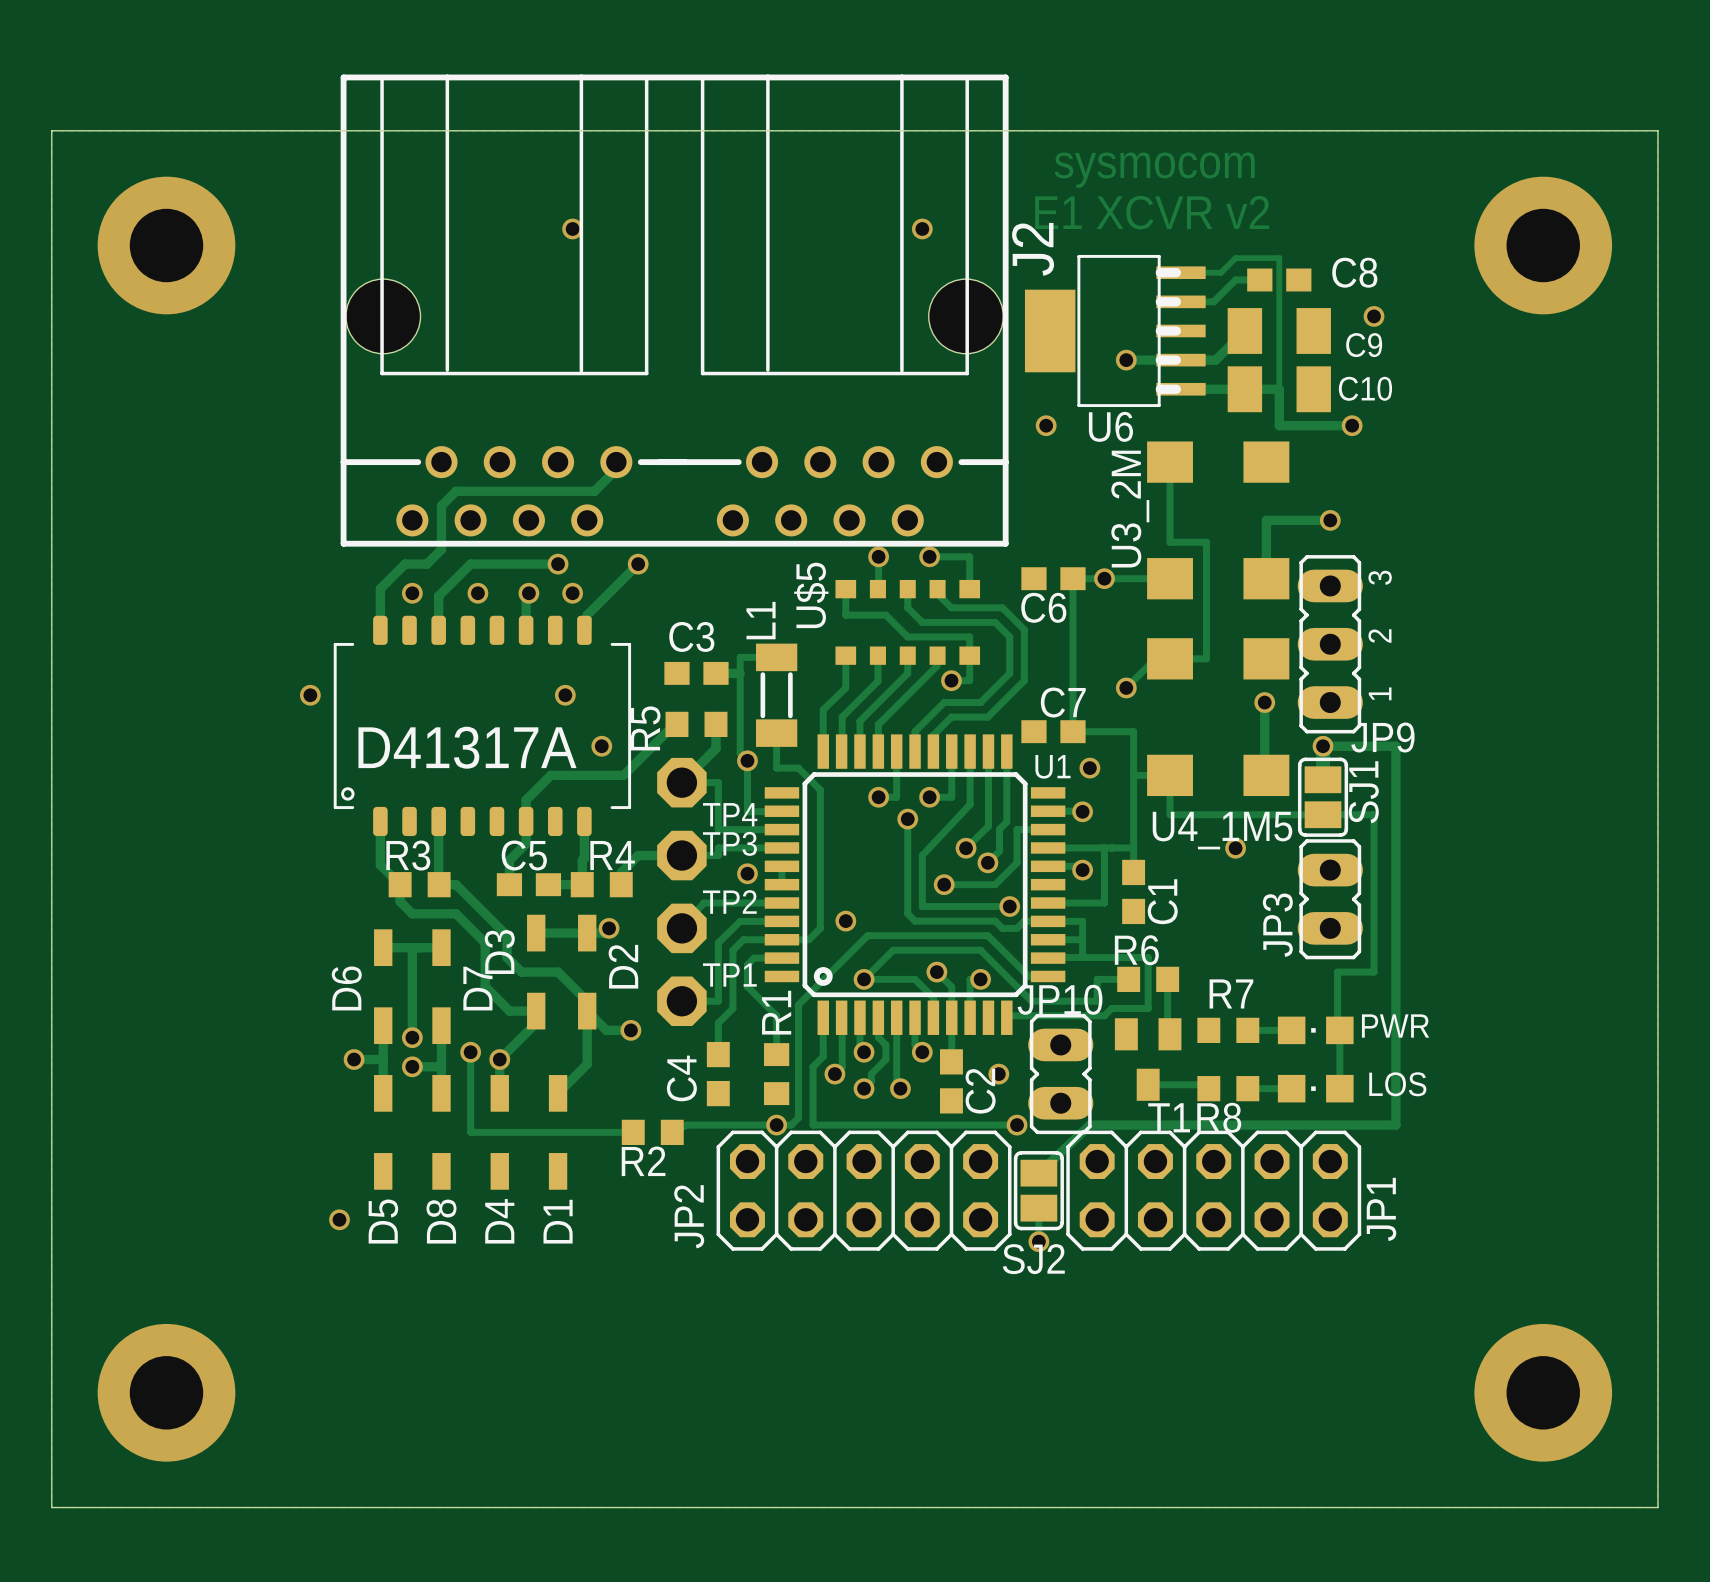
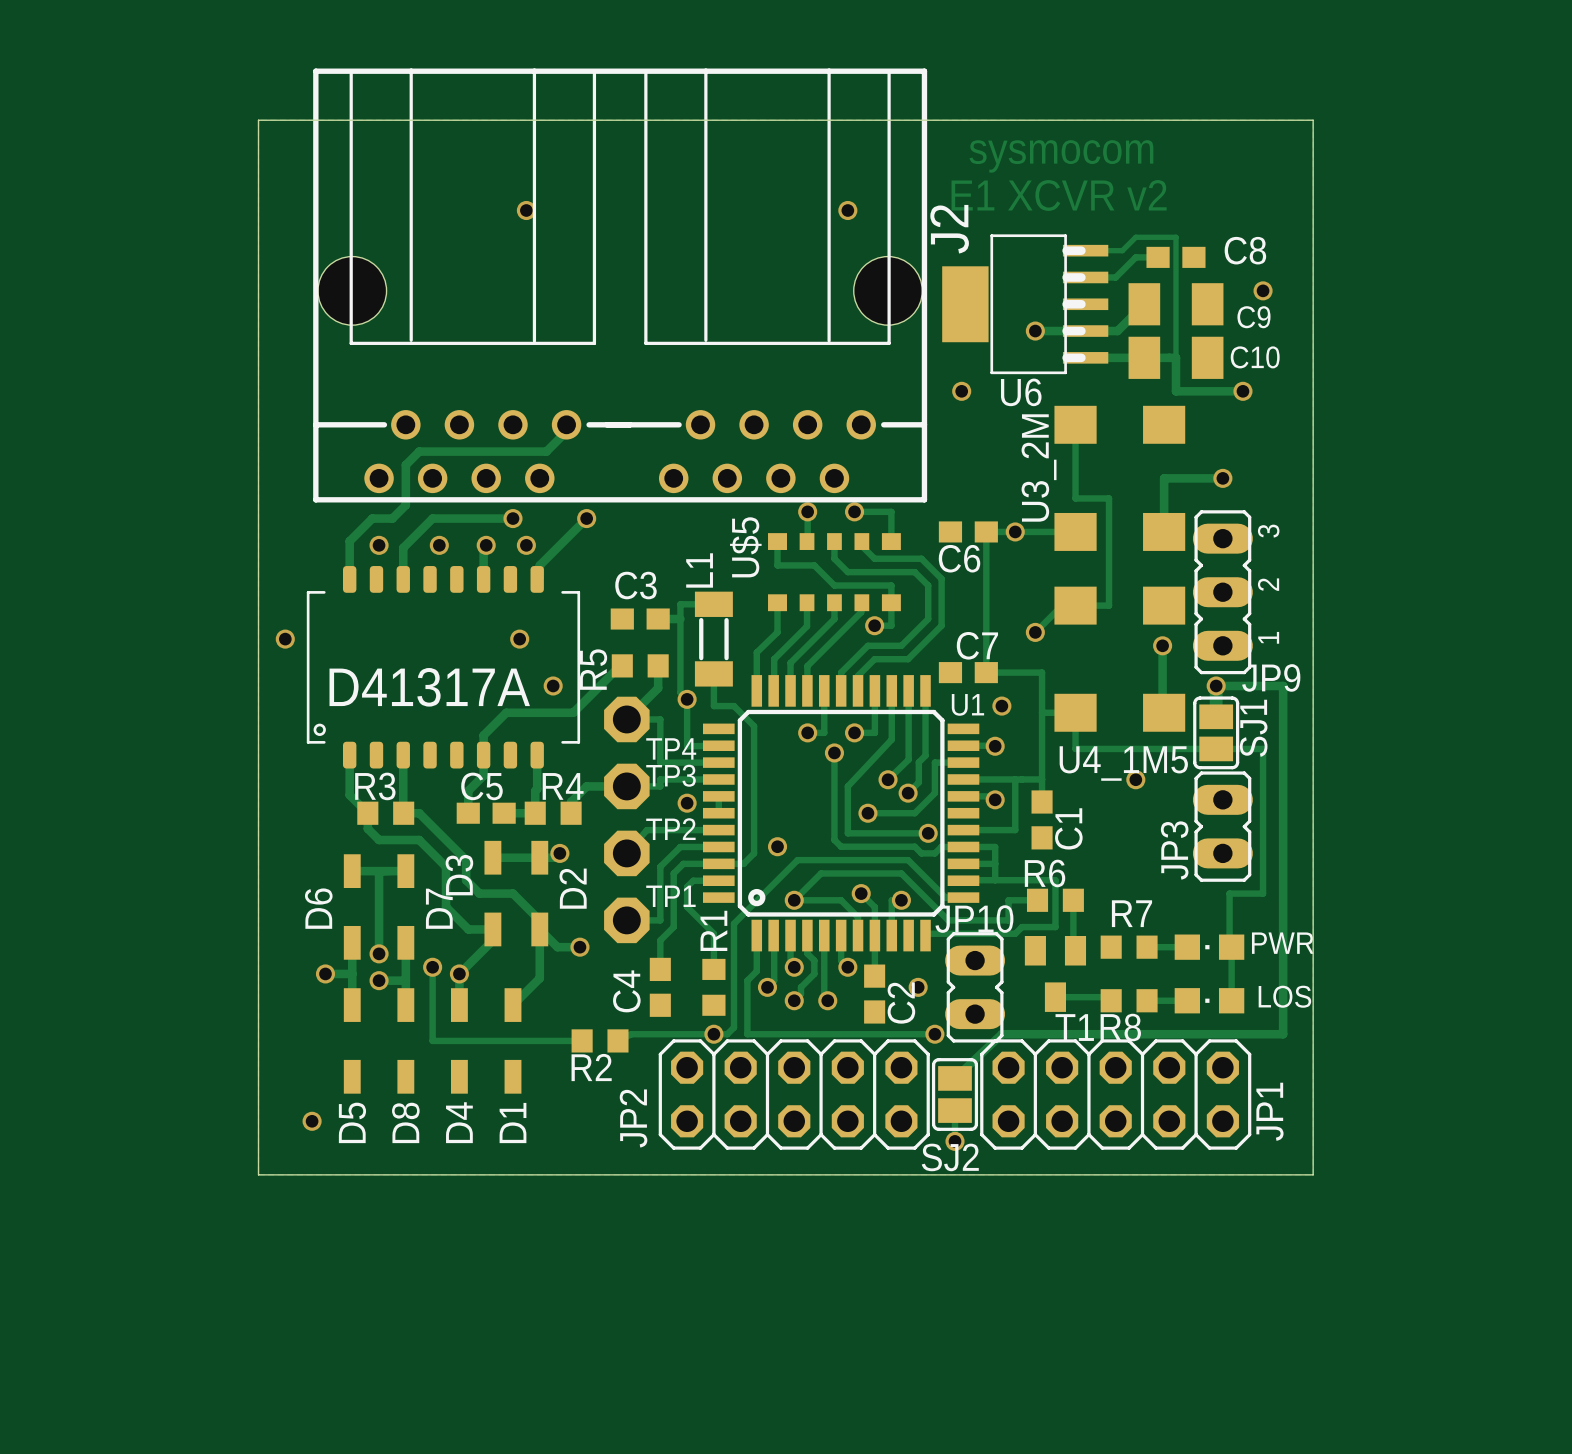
board edge: (281, 130) (51, 130) (51, 1507) (1657, 1507) (1657, 130) (1428, 130) -> (258, 120) (258, 1174) (1313, 1174) (1313, 120)
via: (166, 245) -> none
via: (1543, 245) -> none
via: (166, 1392) -> none
via: (1543, 1392) -> none

